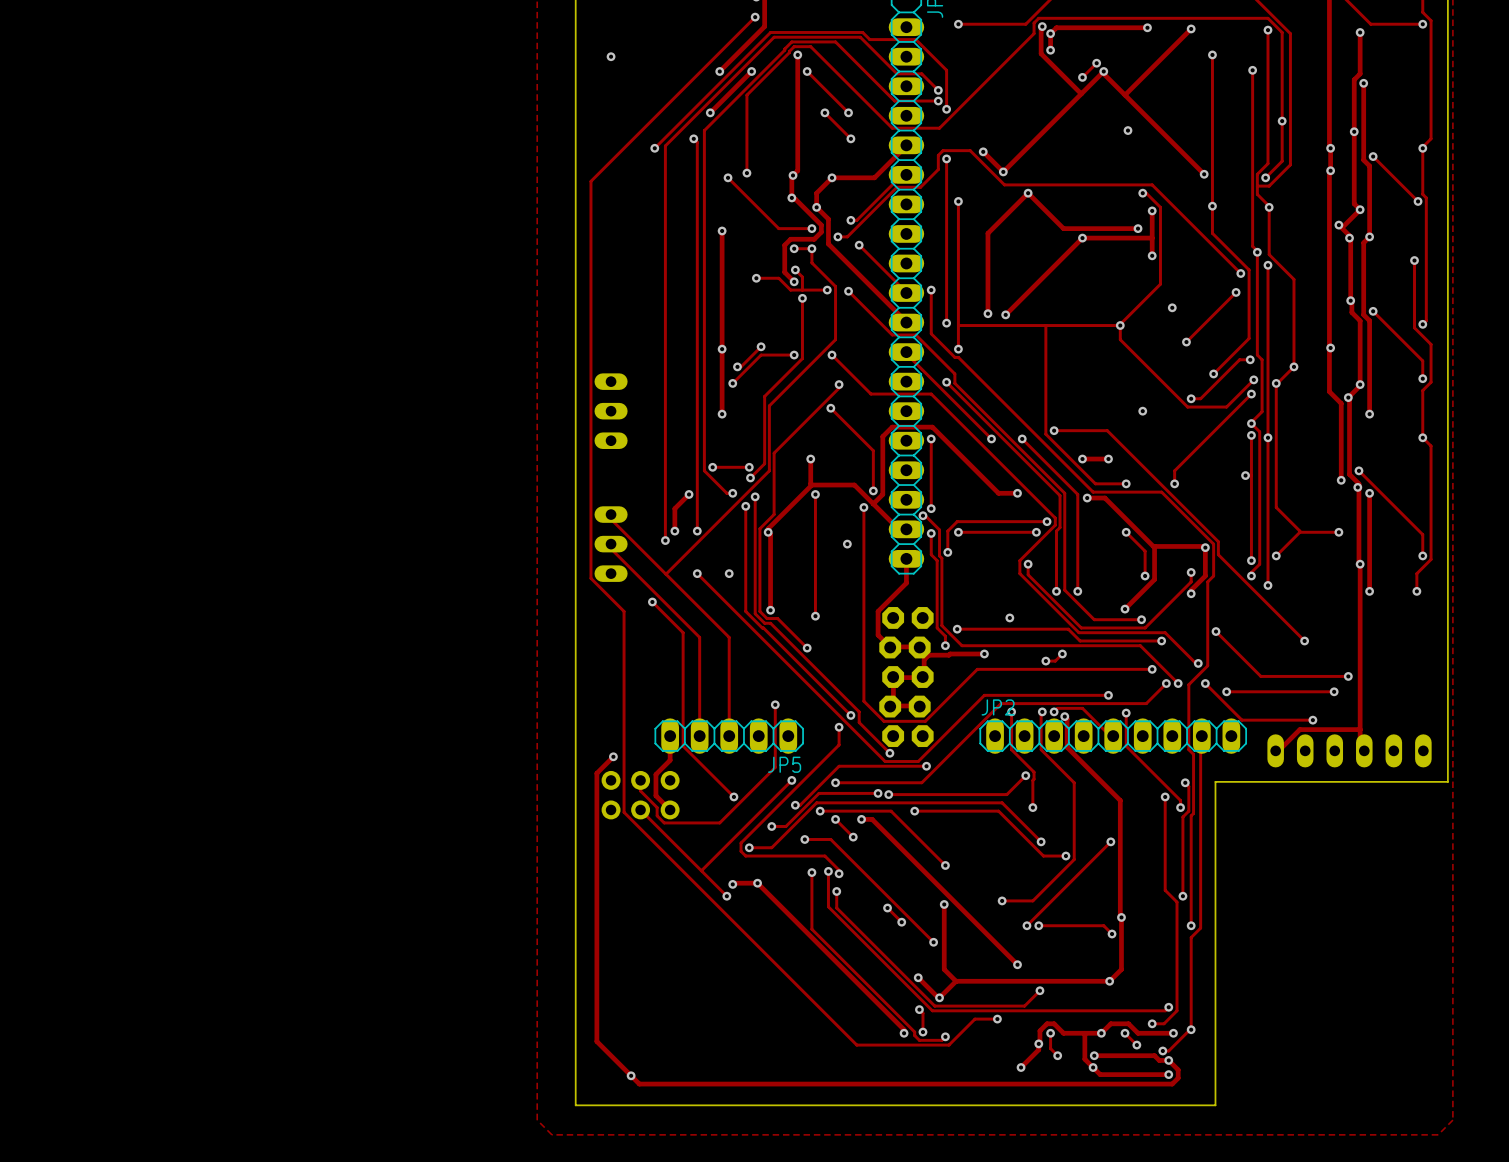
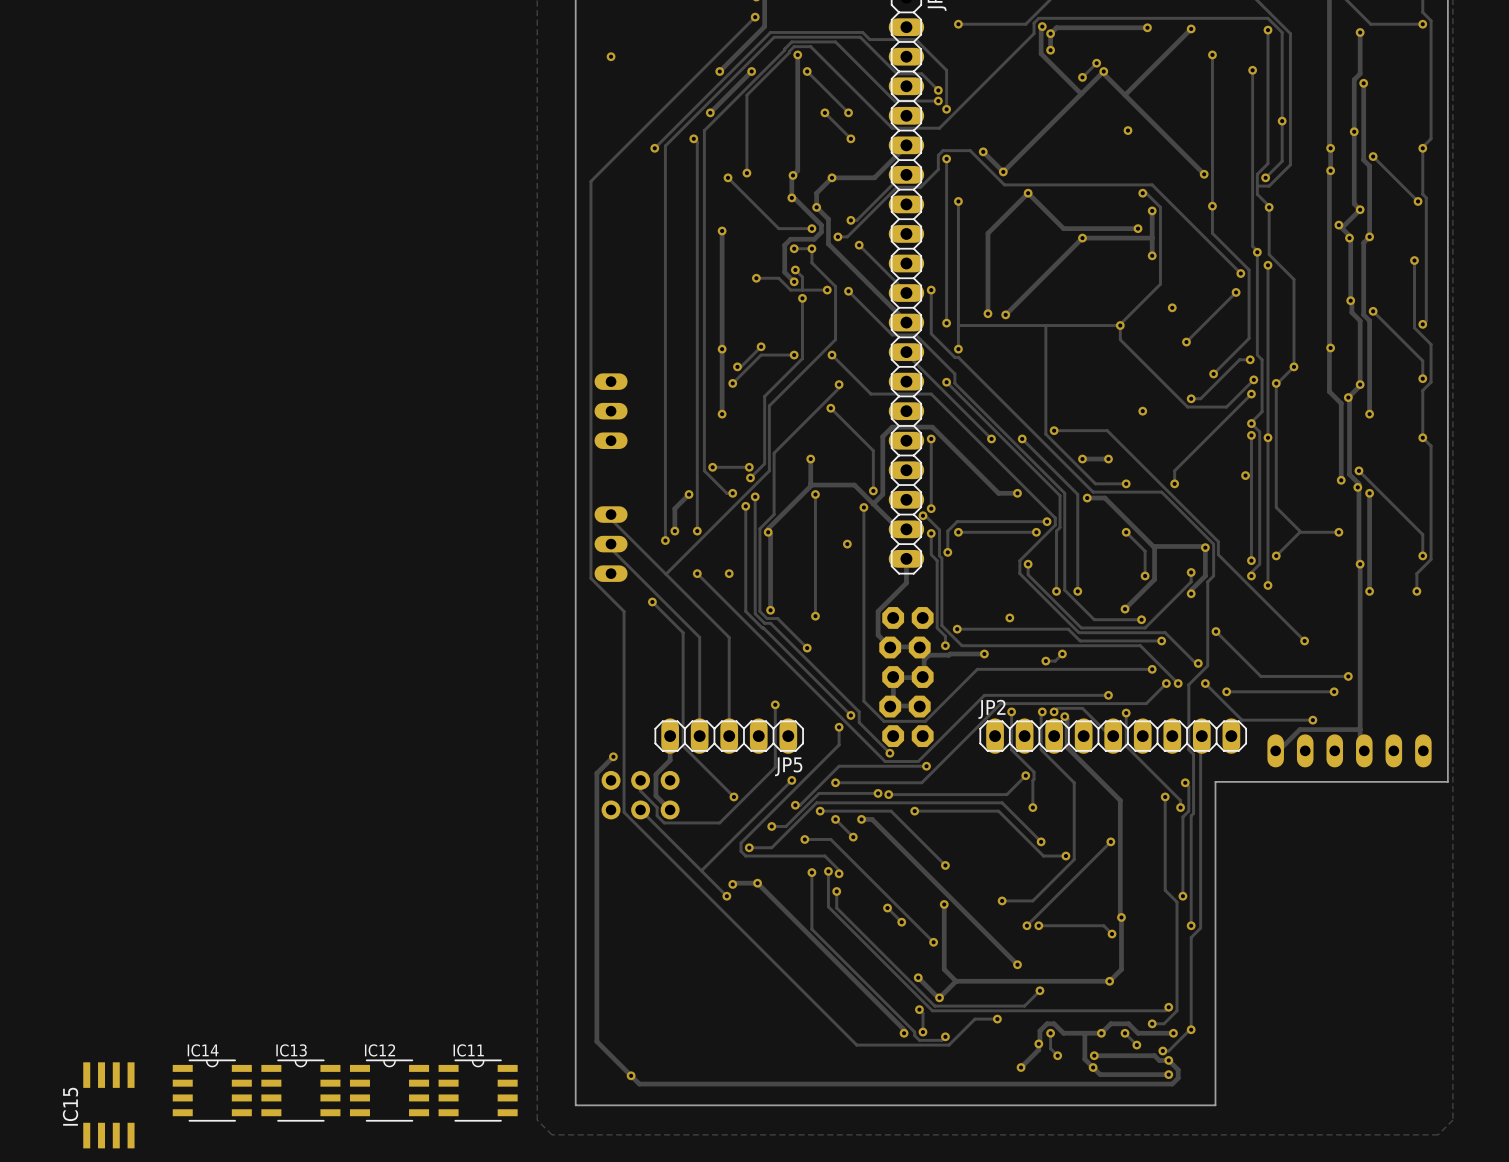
IC14: none -> (212, 1090)
IC13: none -> (300, 1090)
IC12: none -> (389, 1090)
IC11: none -> (478, 1090)
IC15: none -> (108, 1105)

